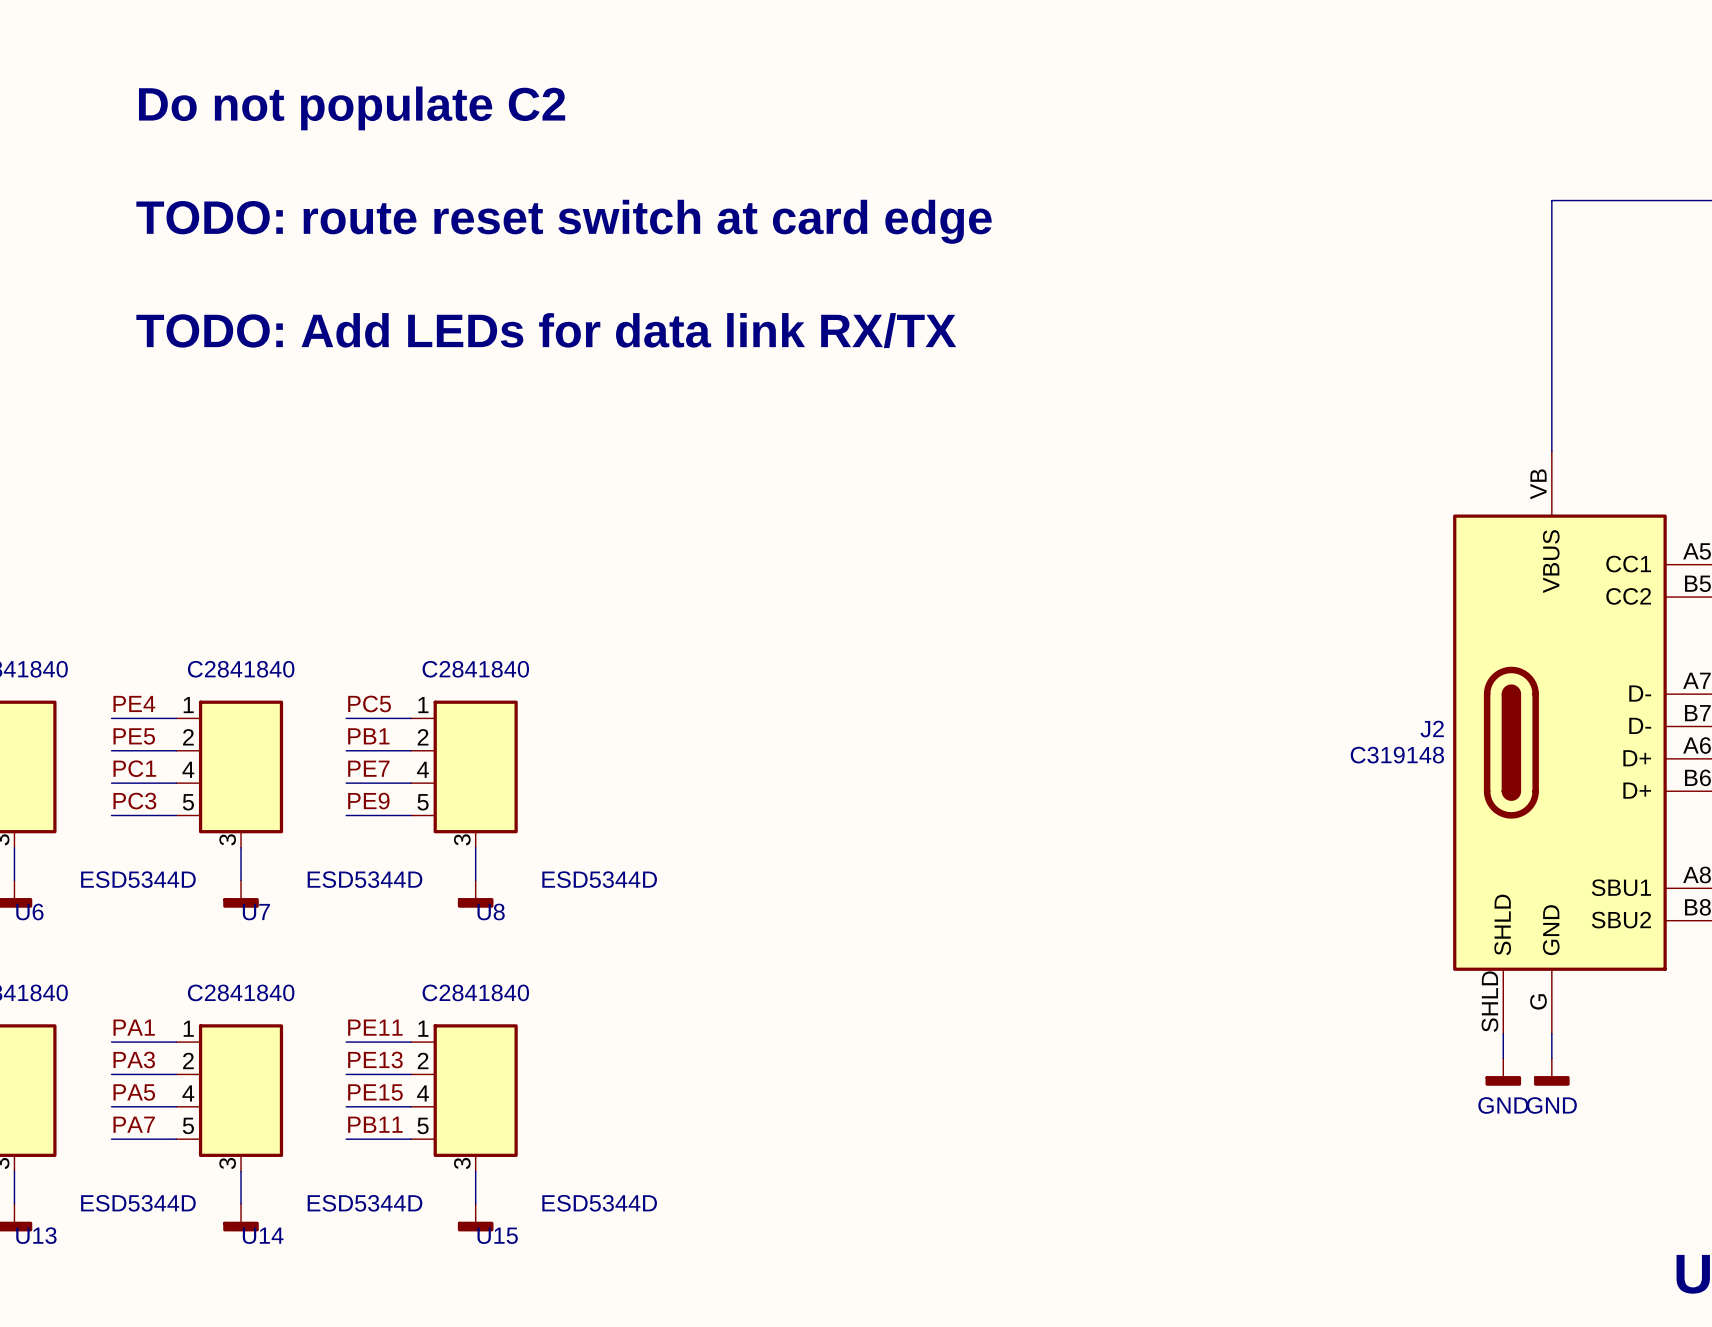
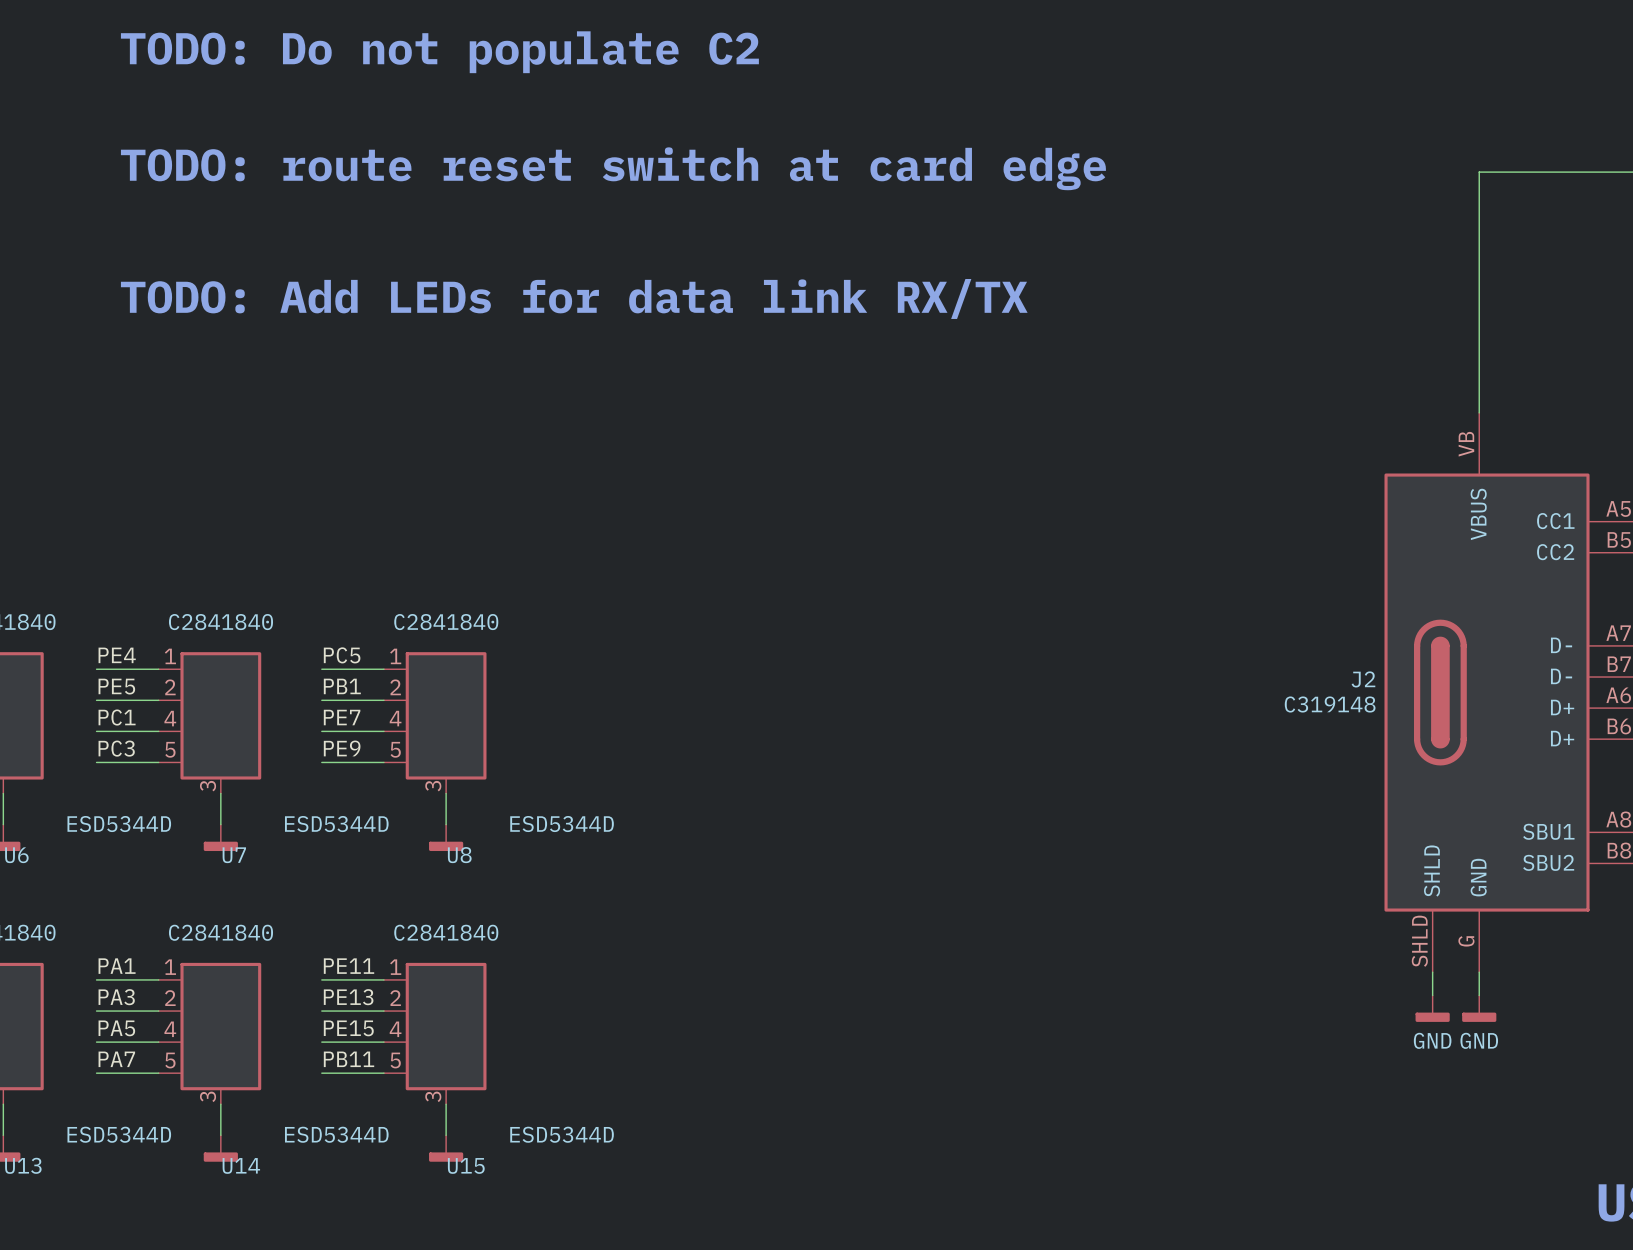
text: Do not populate C2 (352, 108) -> TODO: Do not populate C2 (439, 52)
text position: TODO: route reset switch at card edge (564, 221) -> TODO: route reset switch at card edge (613, 168)

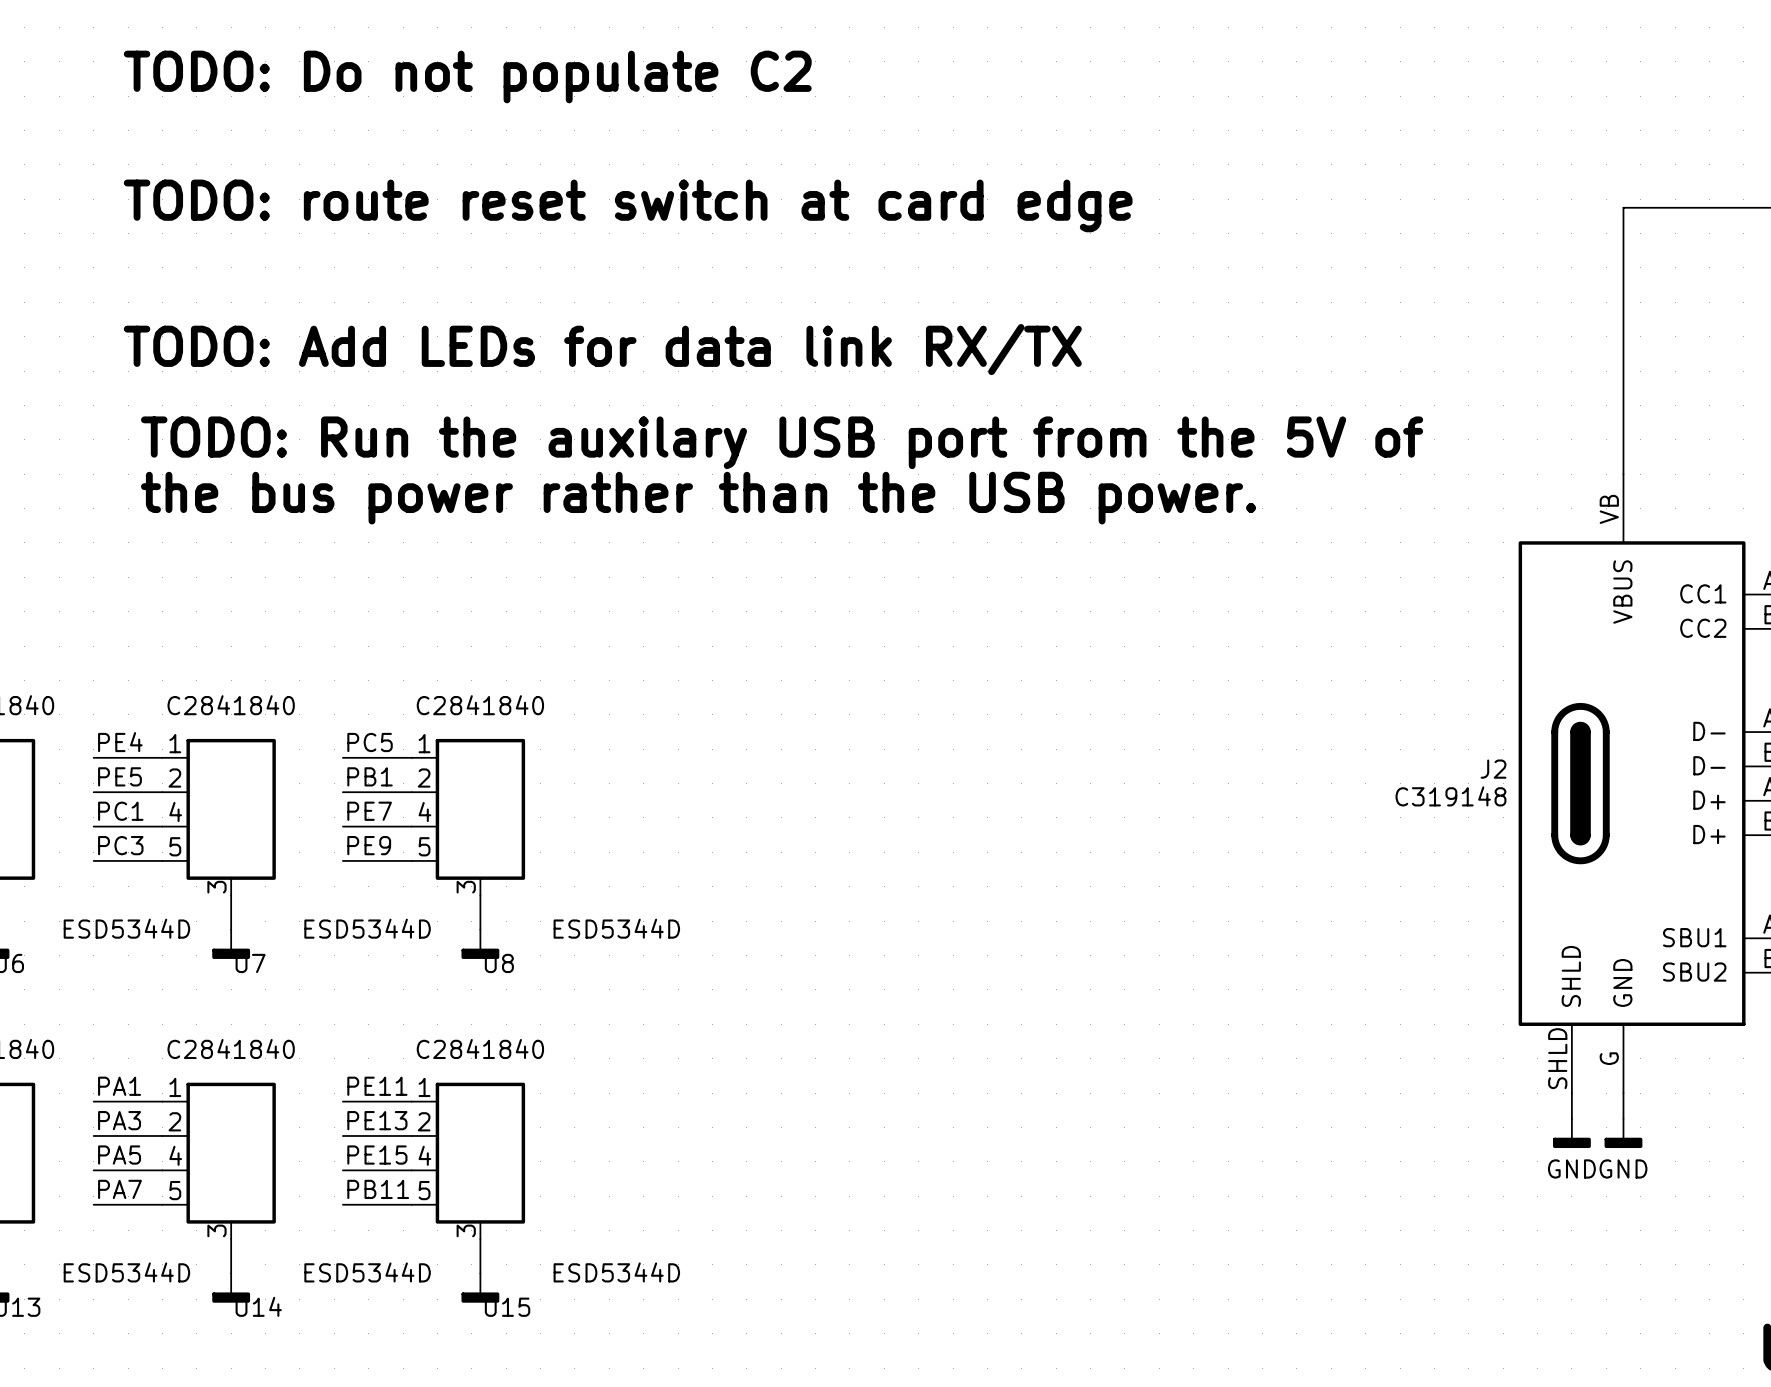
text: none -> TODO: Run the auxilary USB port from the 5V of (782, 442)
text: none -> the bus power rather than the USB power. (698, 498)

